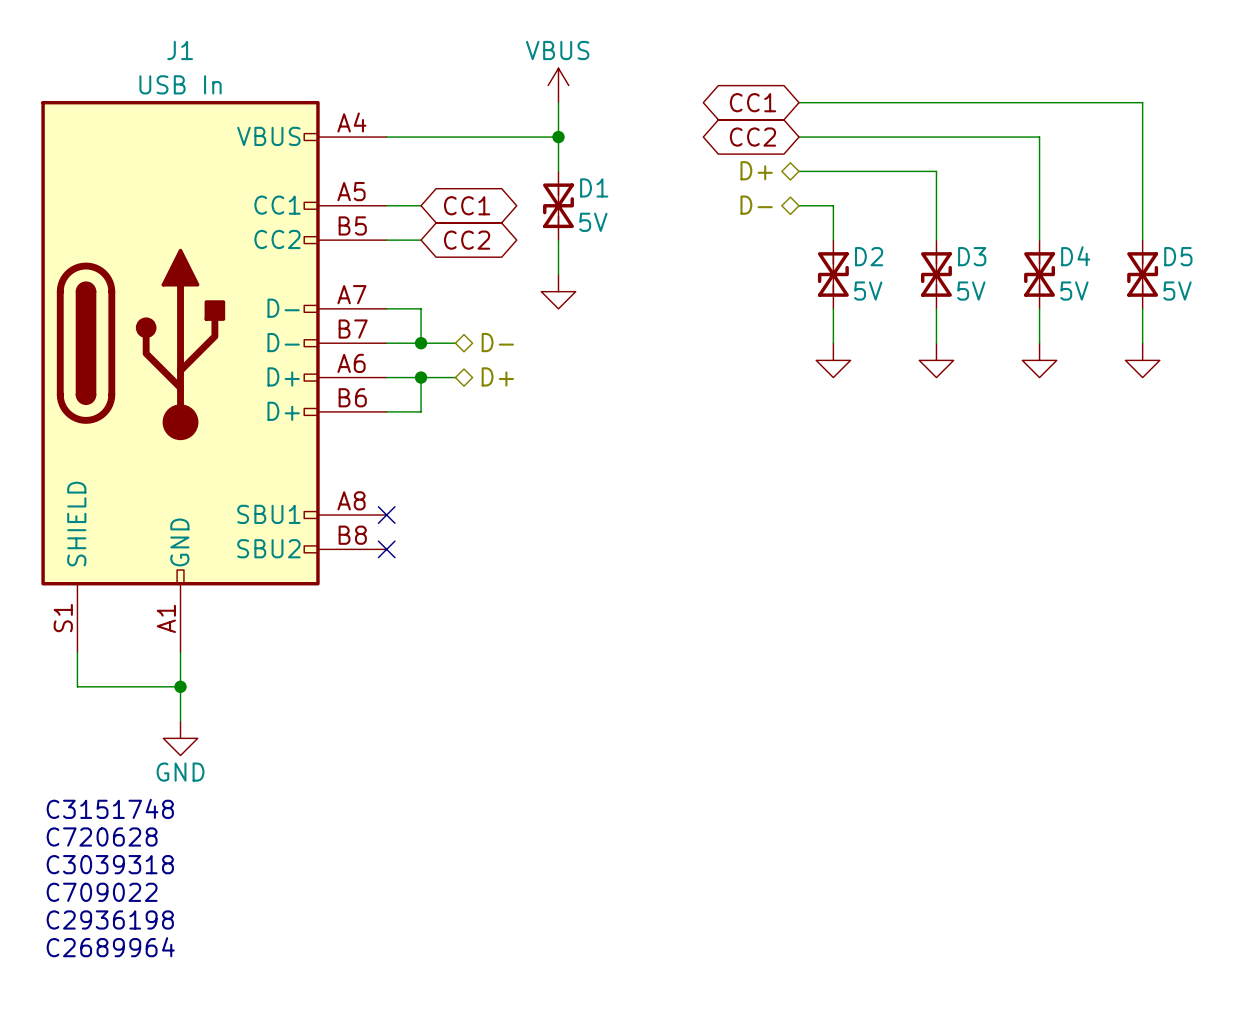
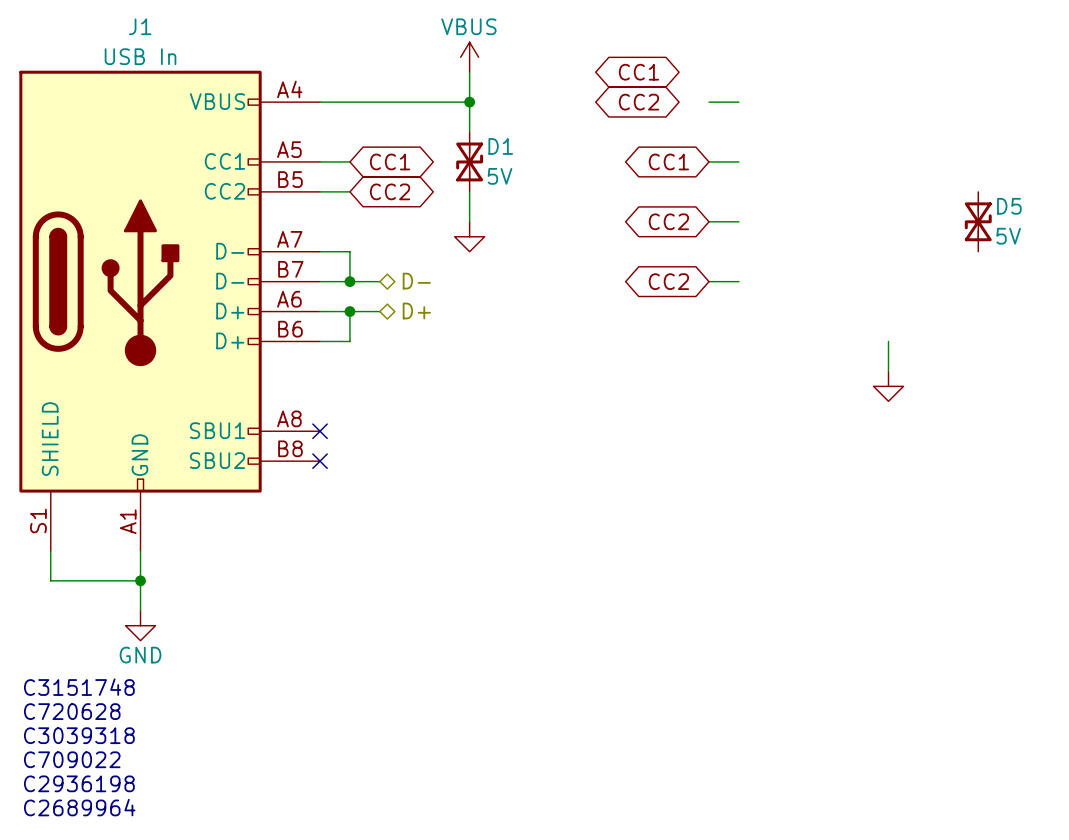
wire: (799, 102) (1142, 102) (1142, 240) -> none
wire: (799, 137) (833, 137) -> (708, 161) (738, 161)
wire: (867, 137) (1039, 137) (1039, 240) -> none
hierarchical label: D+ (756, 170) -> none
wire: (799, 171) (936, 171) (936, 240) -> none
hierarchical label: D- (756, 205) -> none
global label: none -> CC1 (668, 161)
wire: (799, 205) (833, 205) (833, 240) -> none
global label: none -> CC2 (668, 221)
wire: none -> (708, 221) (738, 221)
D2: 5V (833, 274) -> none
D3: 5V (936, 274) -> none
D4: 5V (1039, 274) -> none
wire: (833, 308) (833, 343) -> (738, 281) (708, 281)
wire: (936, 308) (936, 343) -> none
wire: (1039, 308) (1039, 343) -> (888, 341) (888, 371)
wire: (1142, 308) (1142, 343) -> none
global label: none -> CC2 (668, 281)
power symbol: (833, 360) -> none
power symbol: (936, 360) -> none
power symbol: (1039, 360) -> none
power symbol: (1142, 360) -> none
power symbol: none -> (888, 386)

